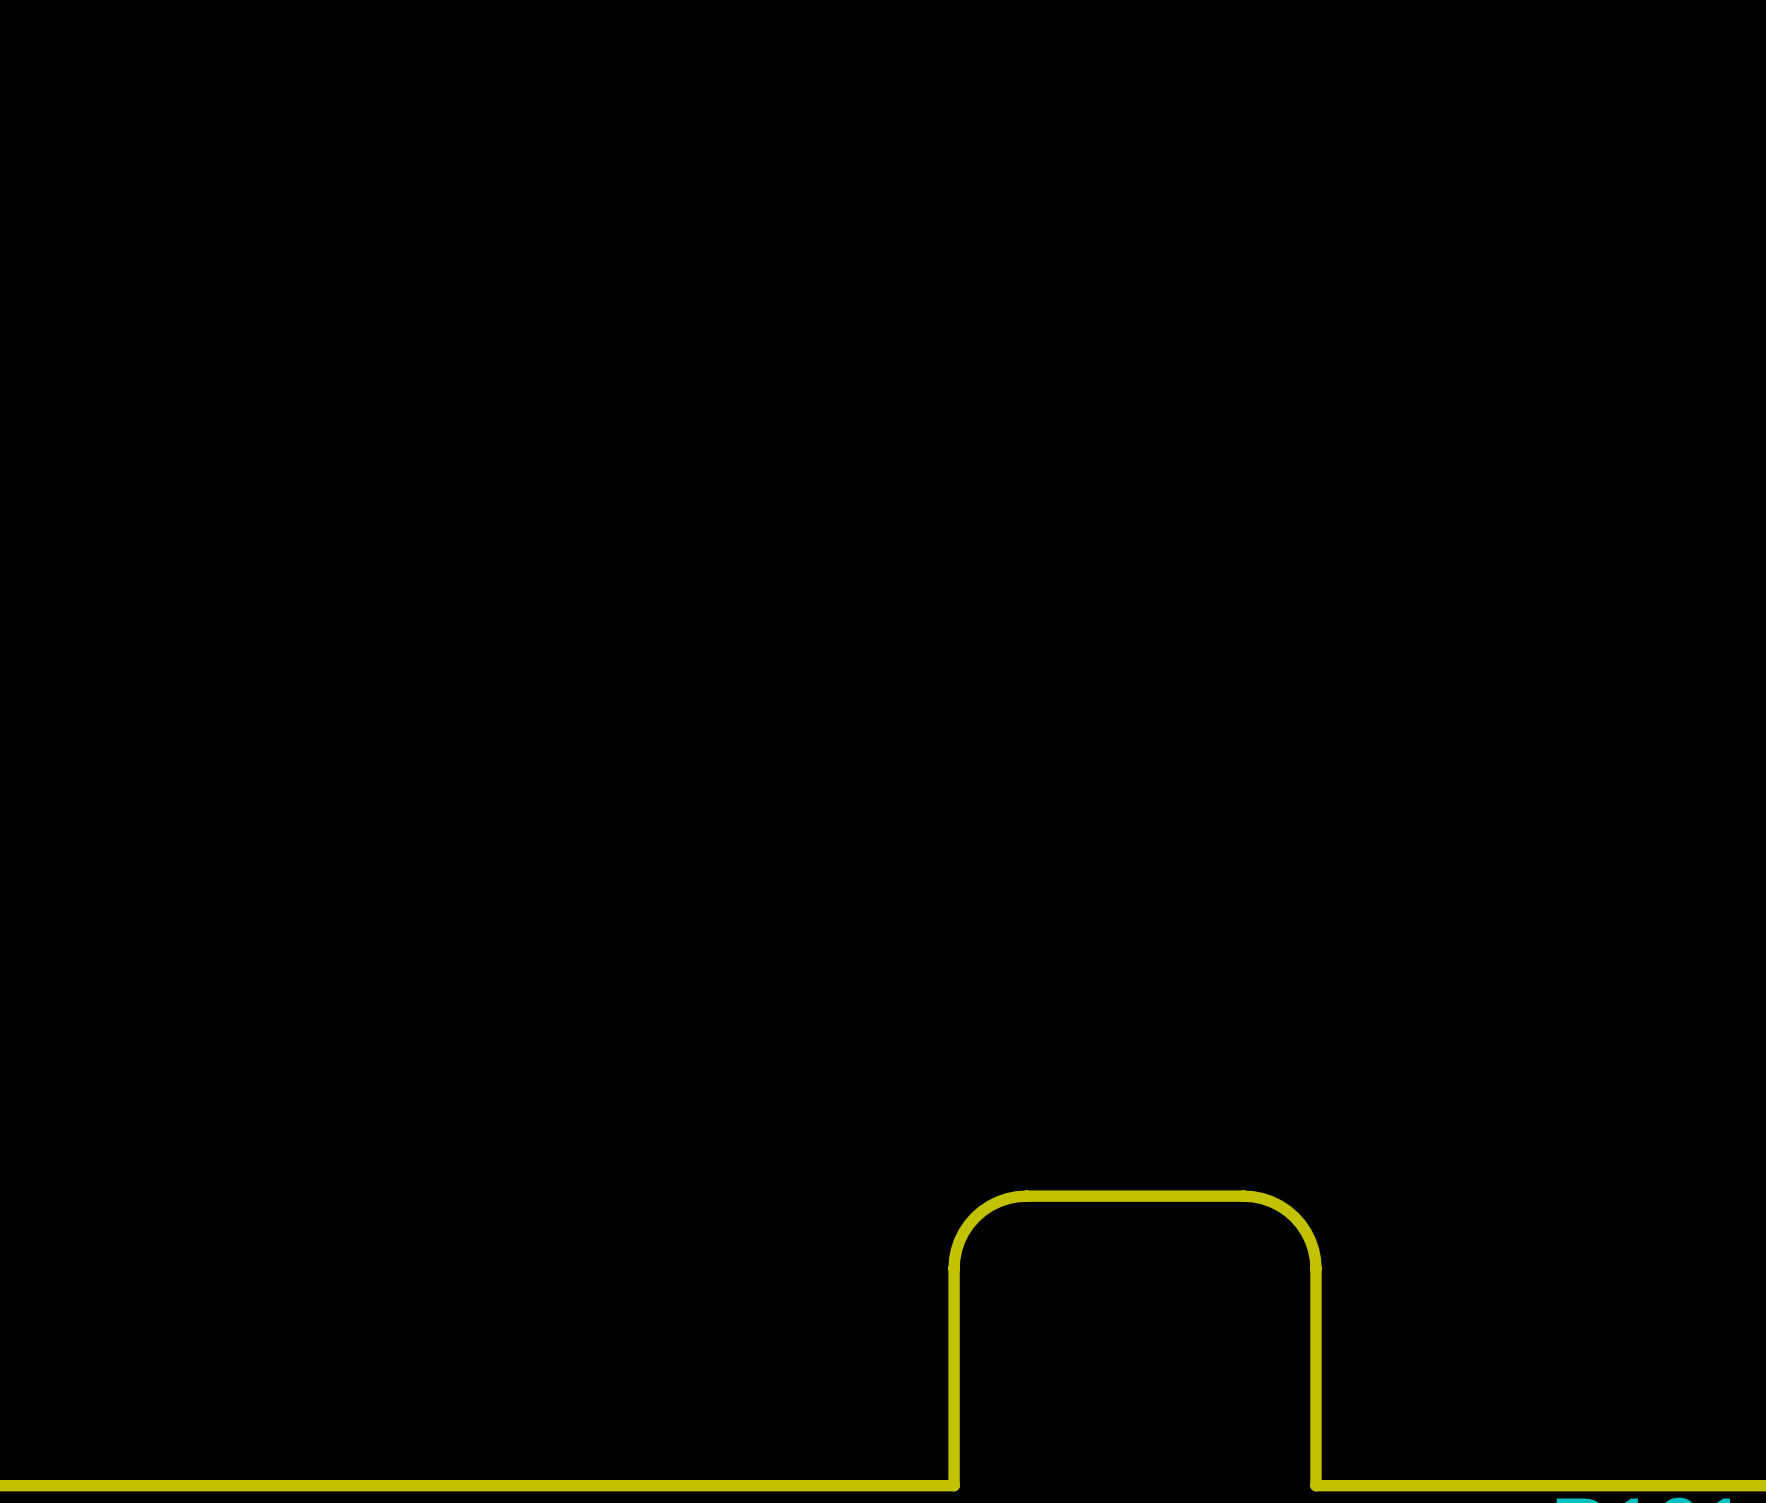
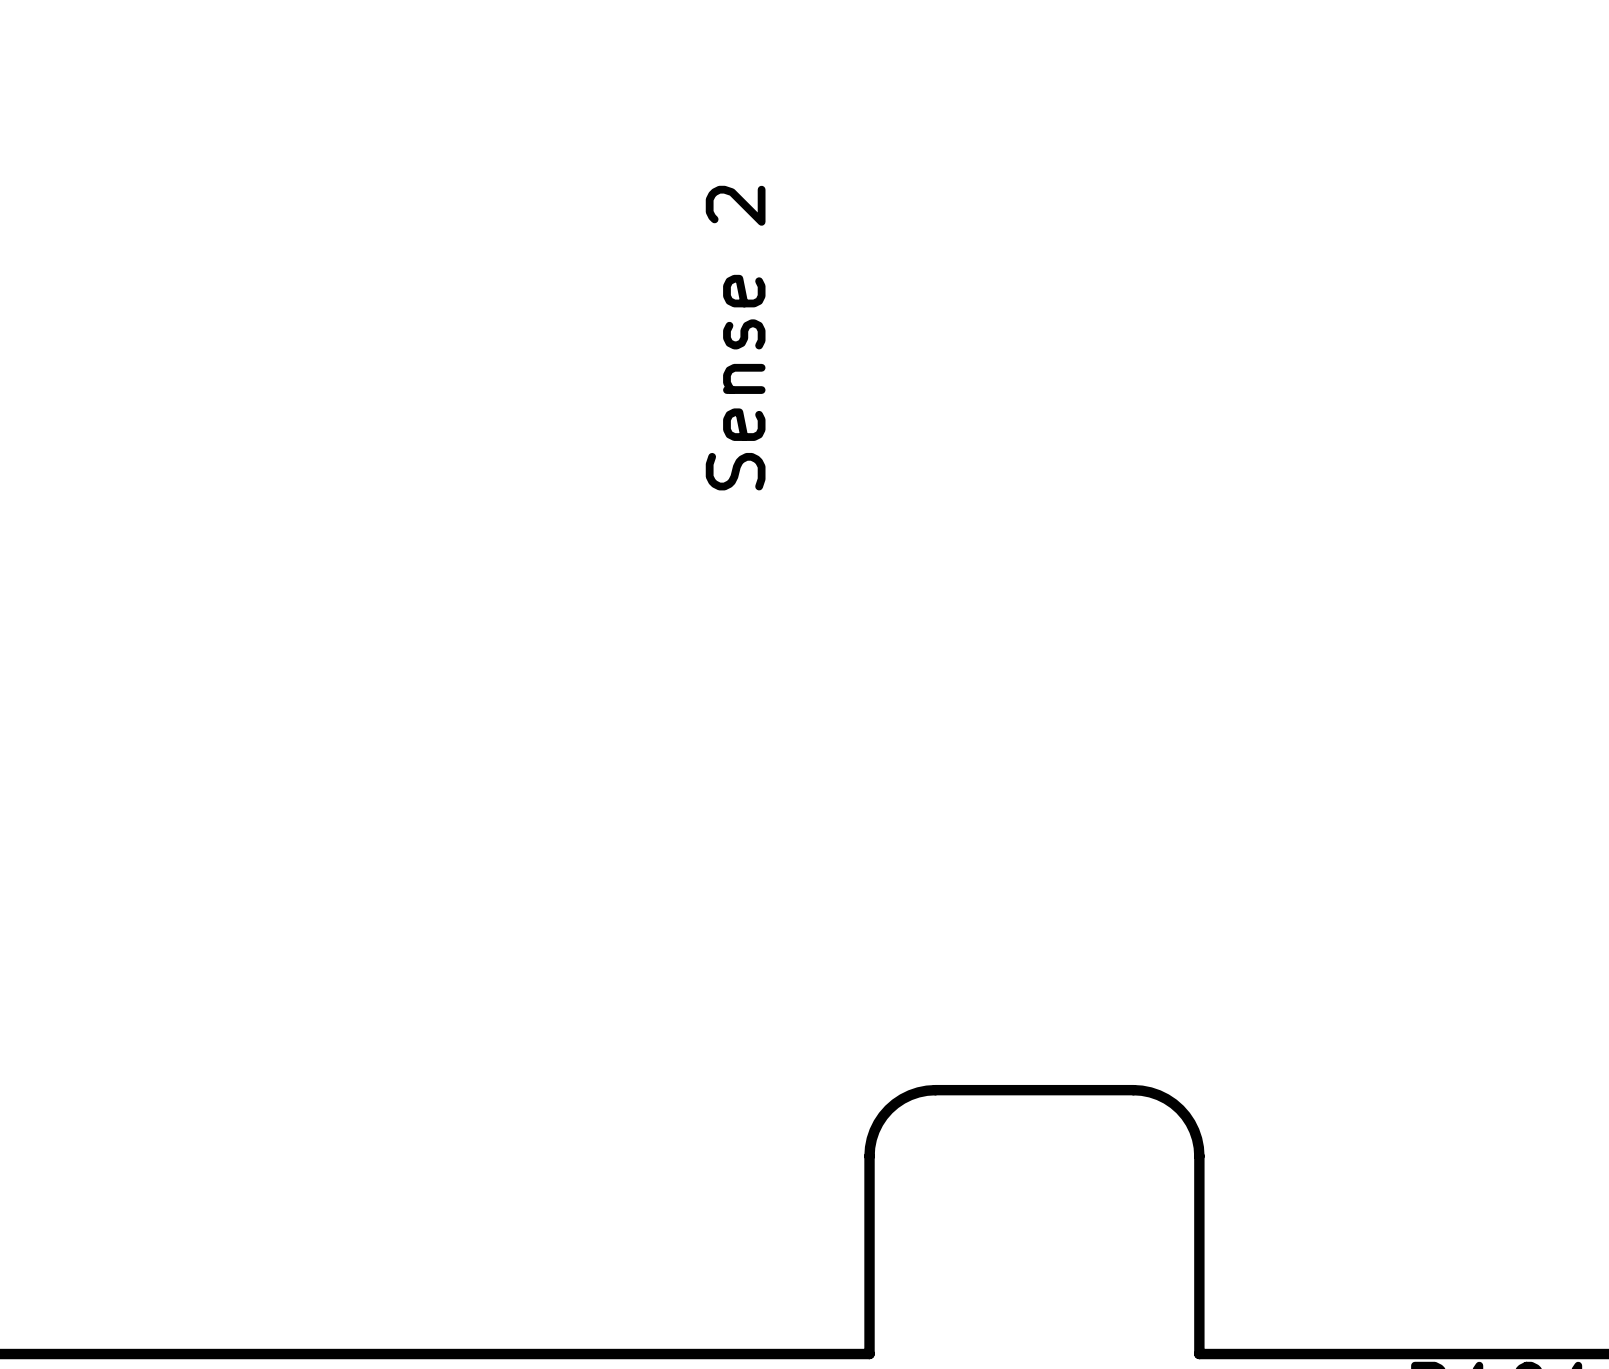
text: none -> Sense 2 (735, 338)

